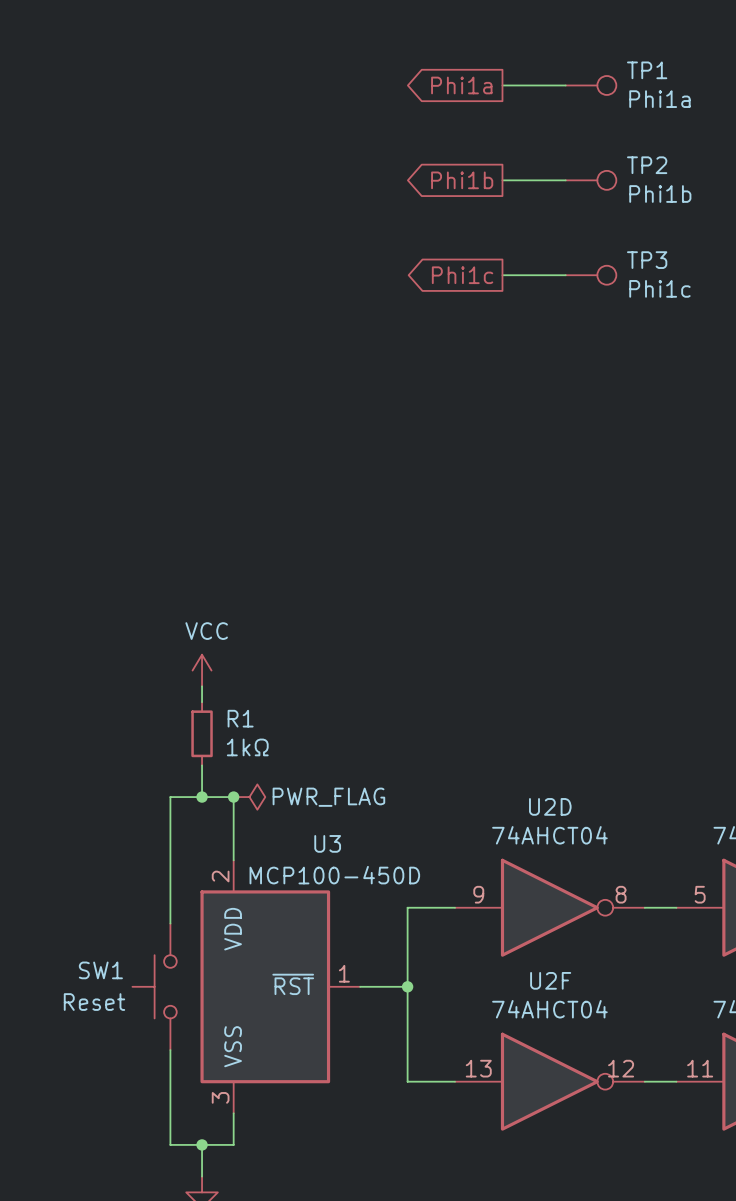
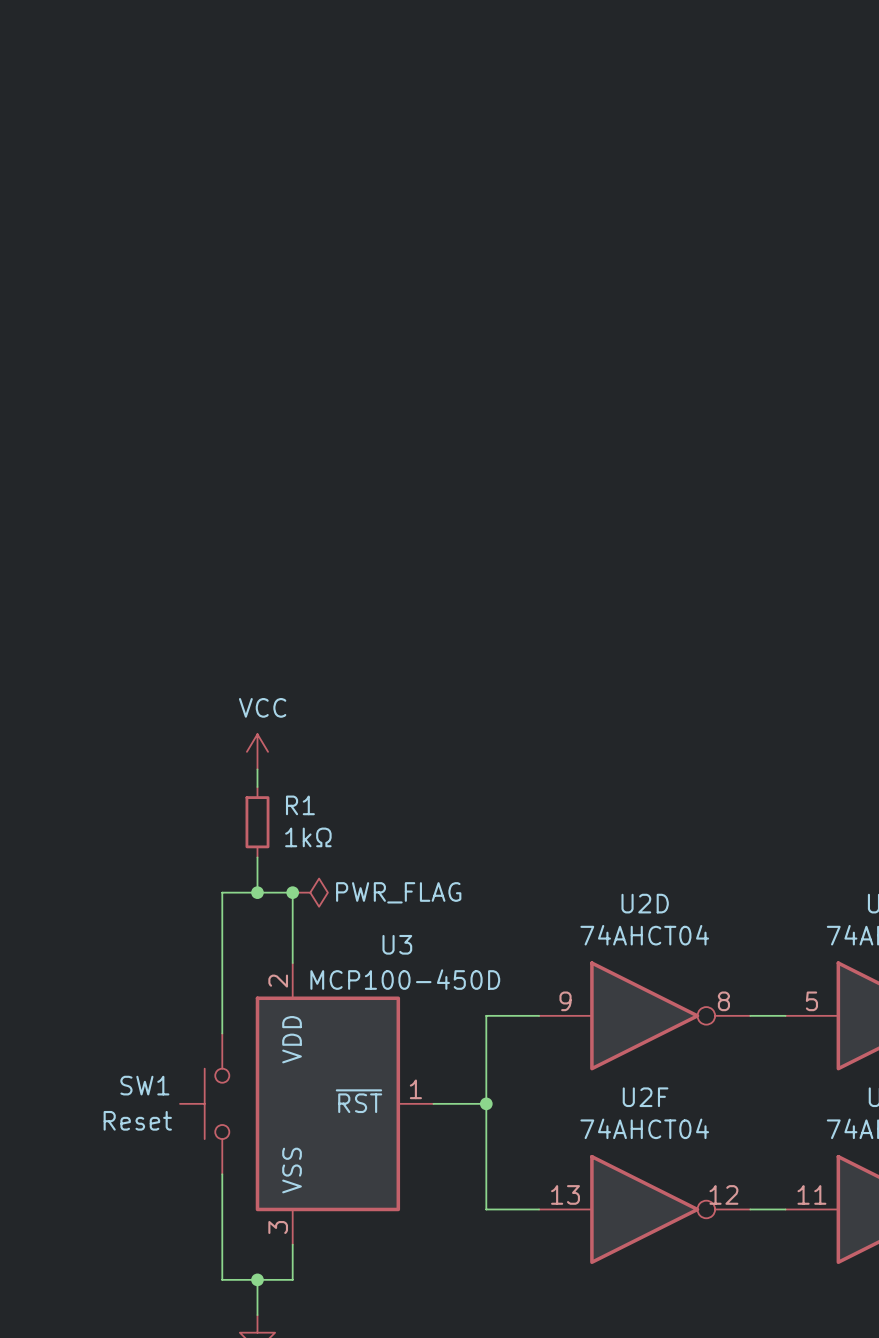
global label: Phi1a (461, 85) -> none
wire: (502, 85) (565, 85) -> none
TP1: Phi1a (591, 85) -> none
global label: Phi1b (462, 180) -> none
wire: (502, 180) (565, 180) -> none
TP2: Phi1b (591, 180) -> none
global label: Phi1c (462, 275) -> none
wire: (502, 275) (565, 275) -> none
TP3: Phi1c (591, 275) -> none

